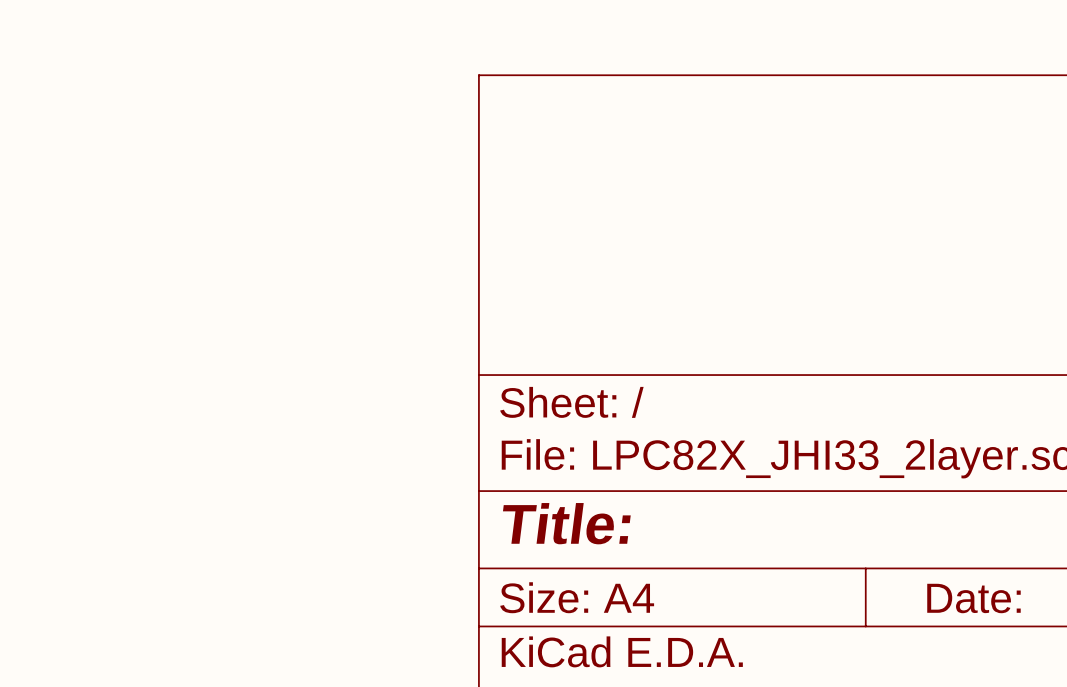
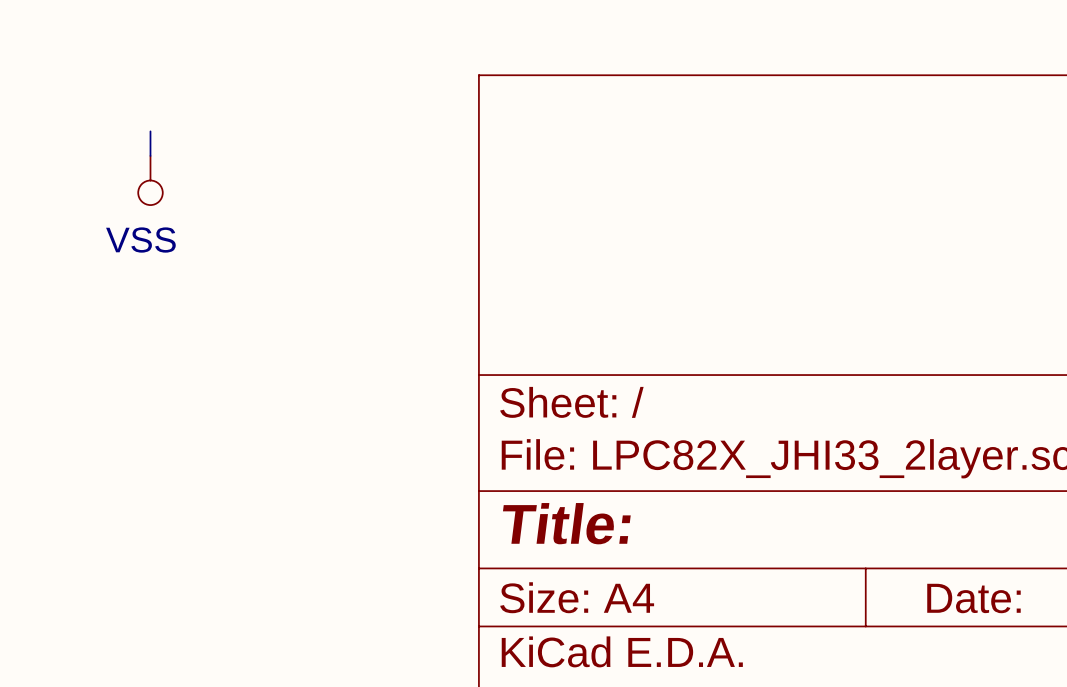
wire: none -> (150, 131) (150, 155)
power symbol: none -> VSS (150, 180)

